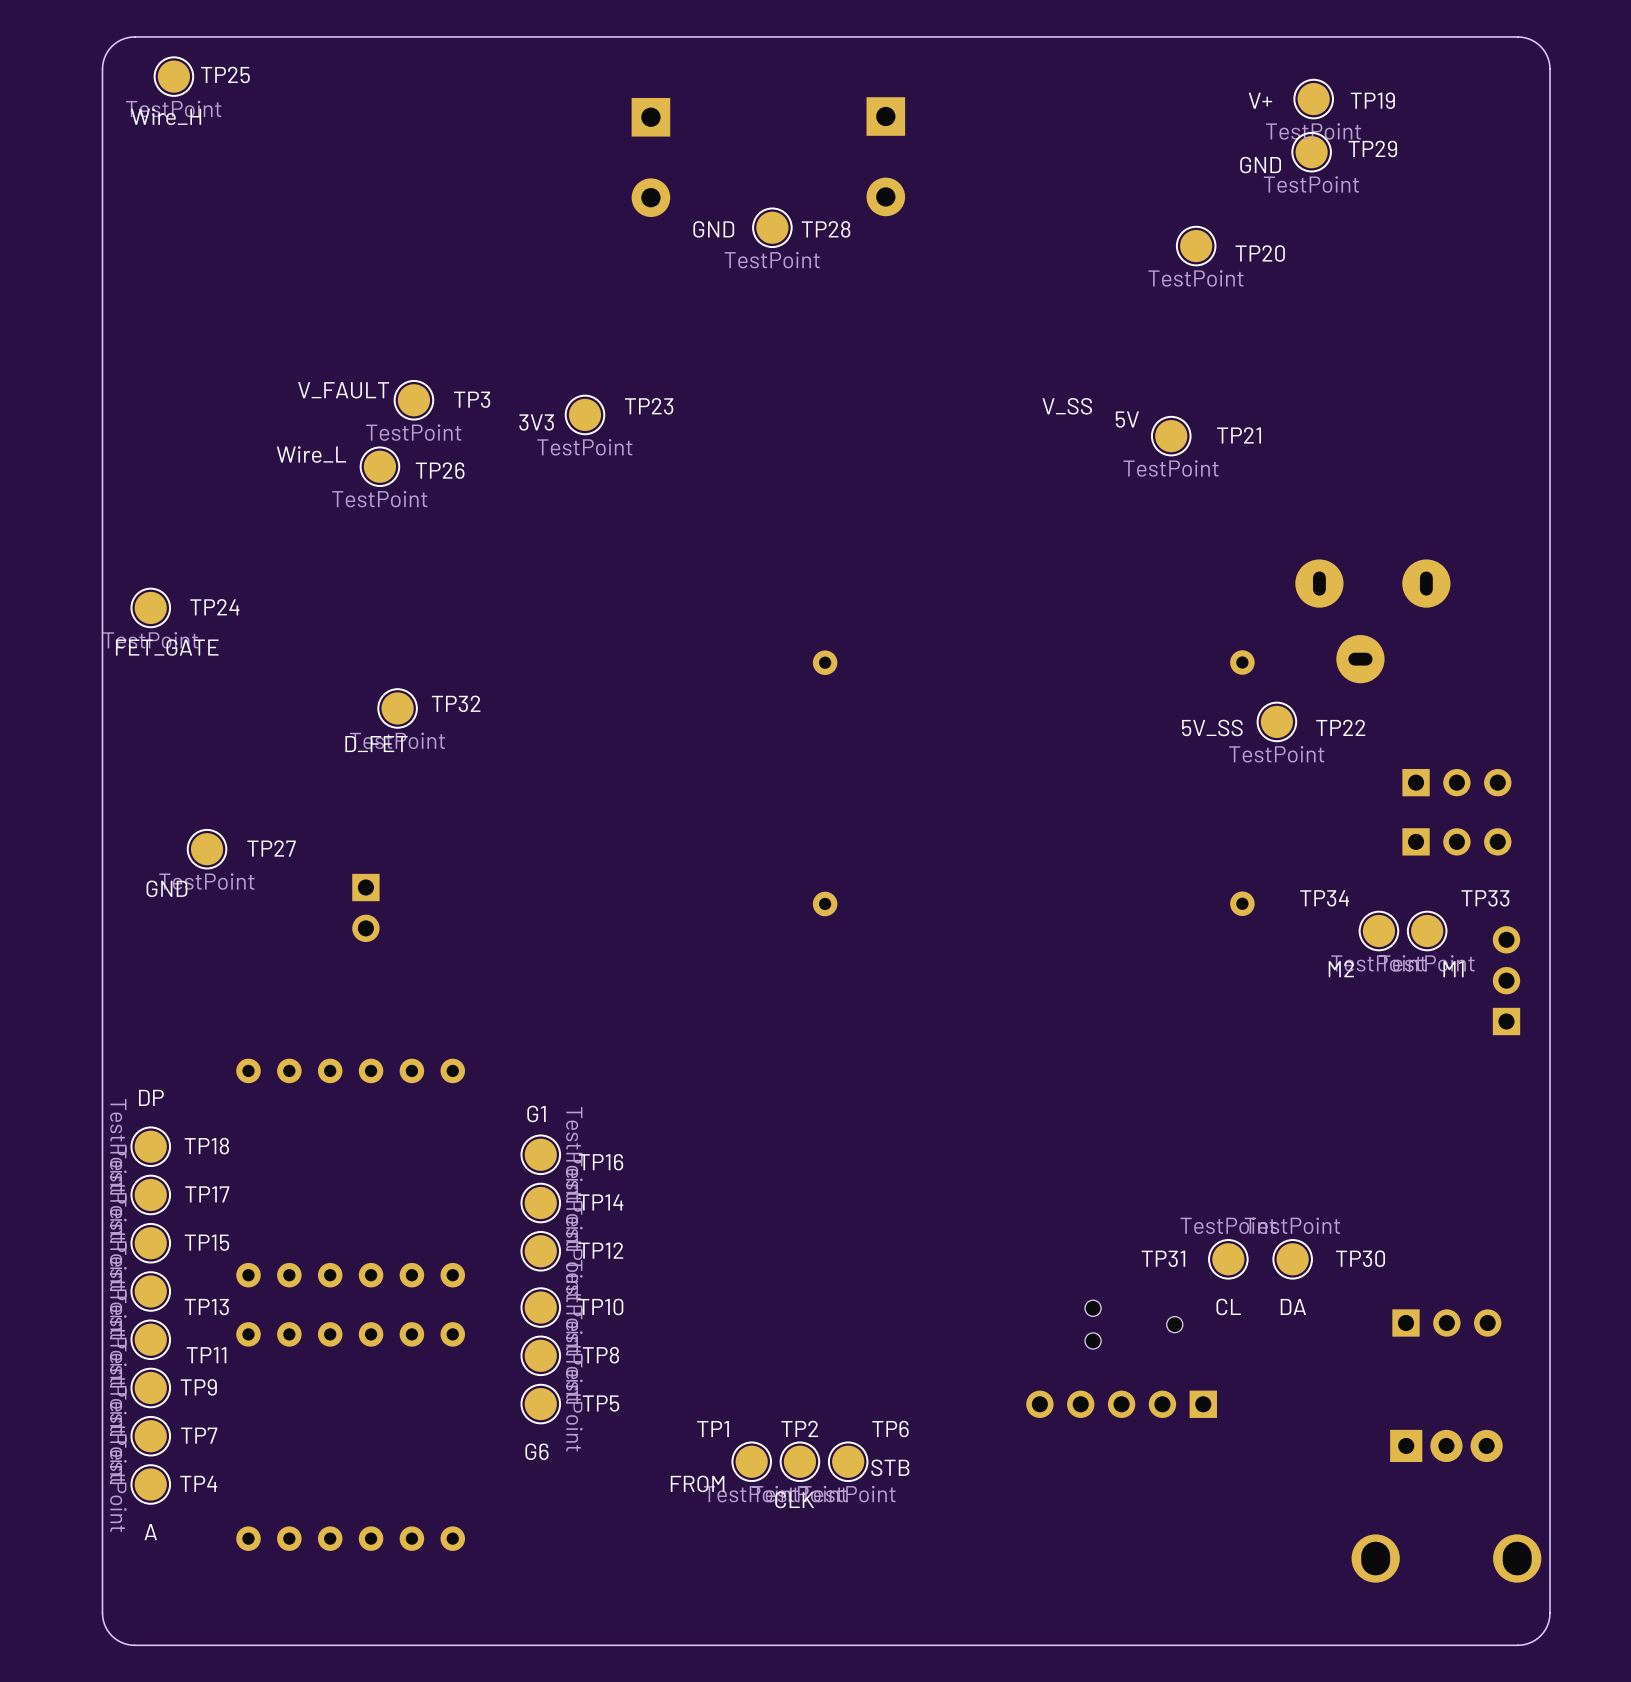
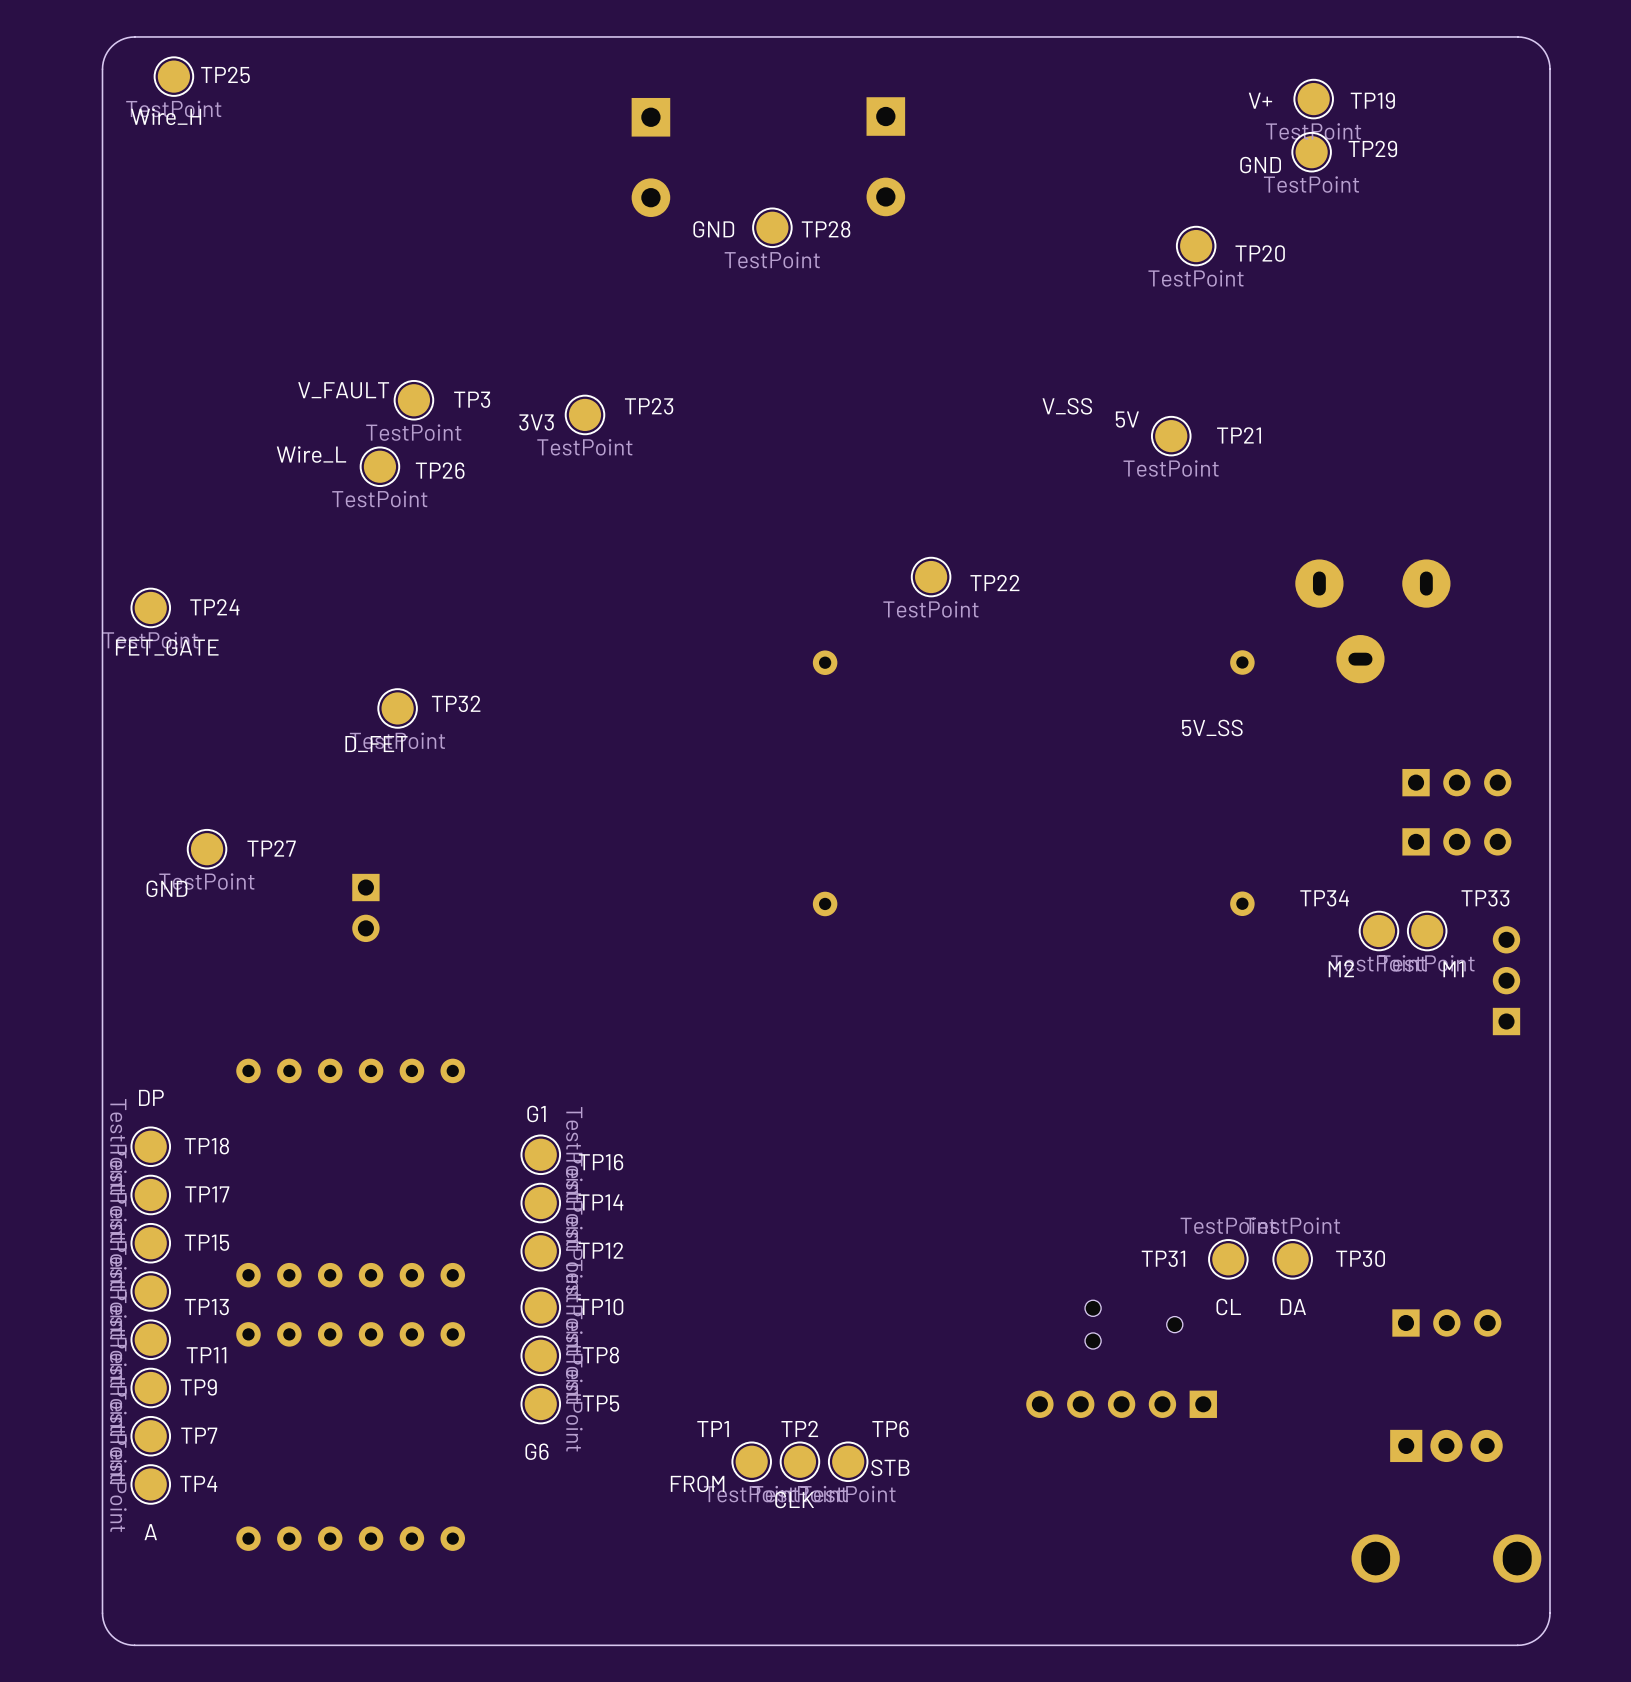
TP22 position: (1276, 721) -> (931, 577)

